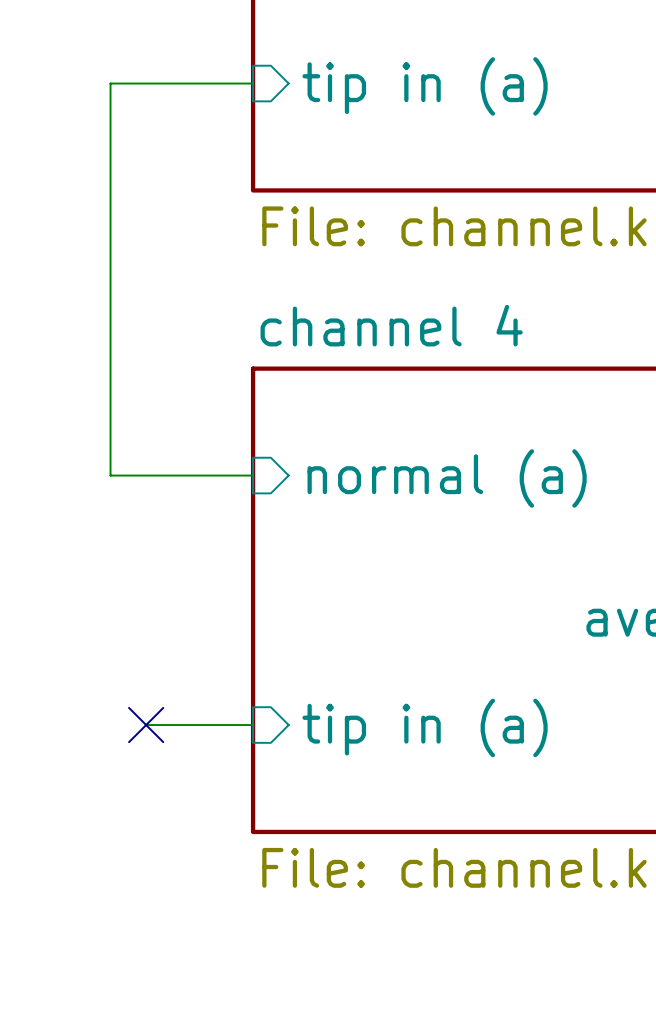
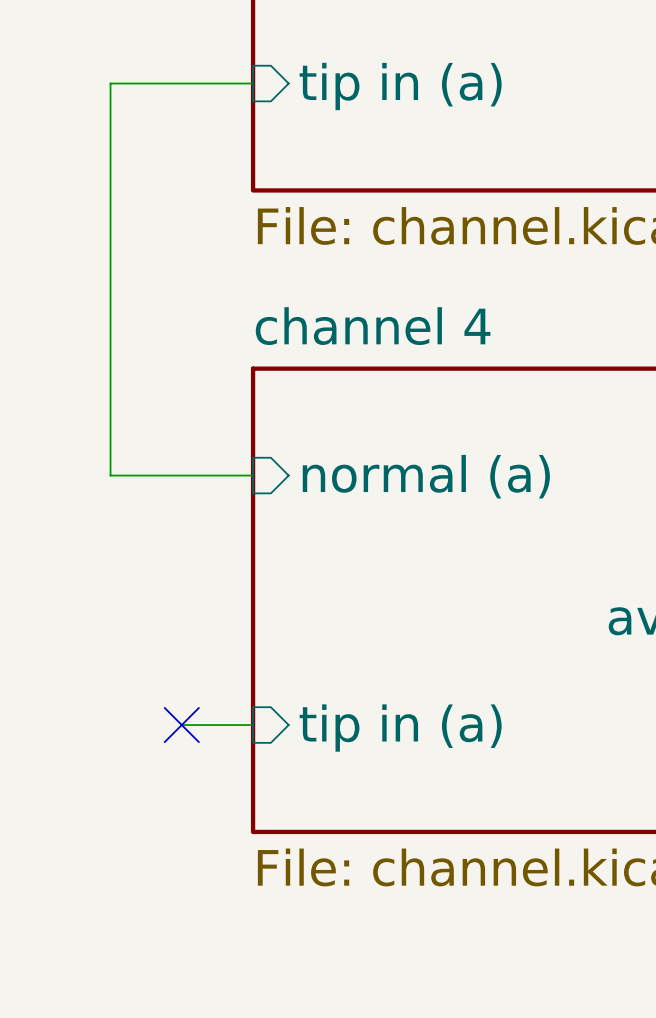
wire: (146, 725) (181, 725) -> none
no-connect mark position: (146, 725) -> (181, 725)

